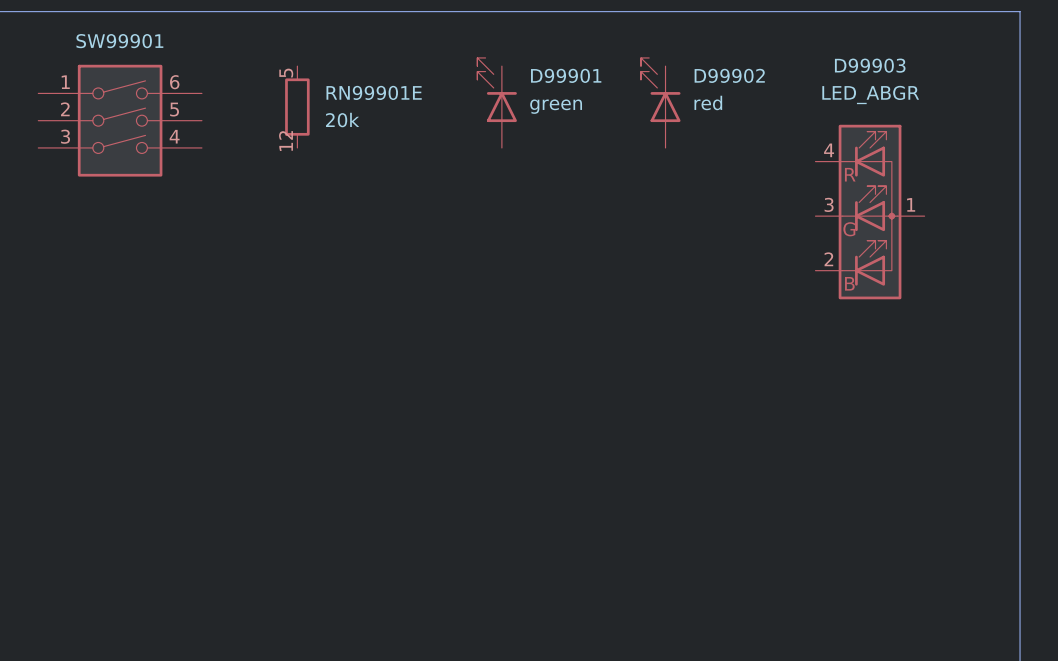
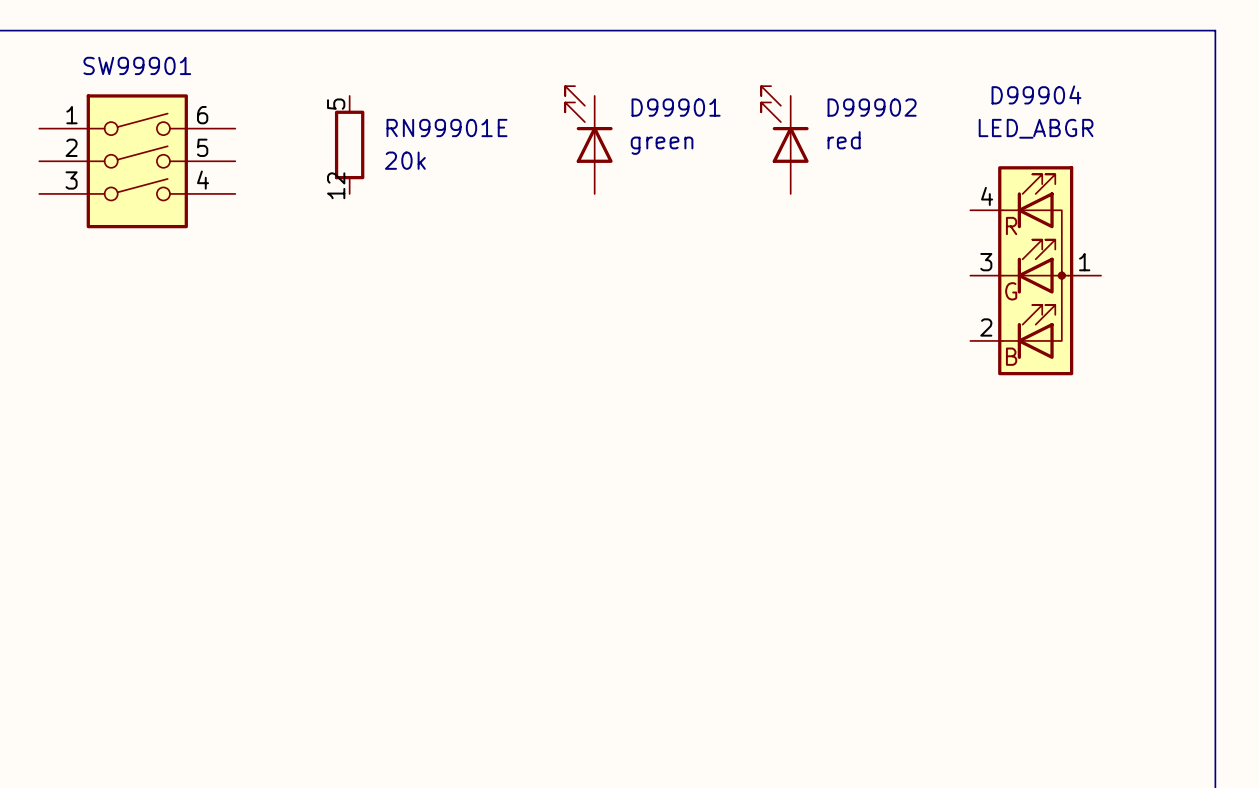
D99903 name: D99903 (870, 65) -> D99904 (1036, 94)

